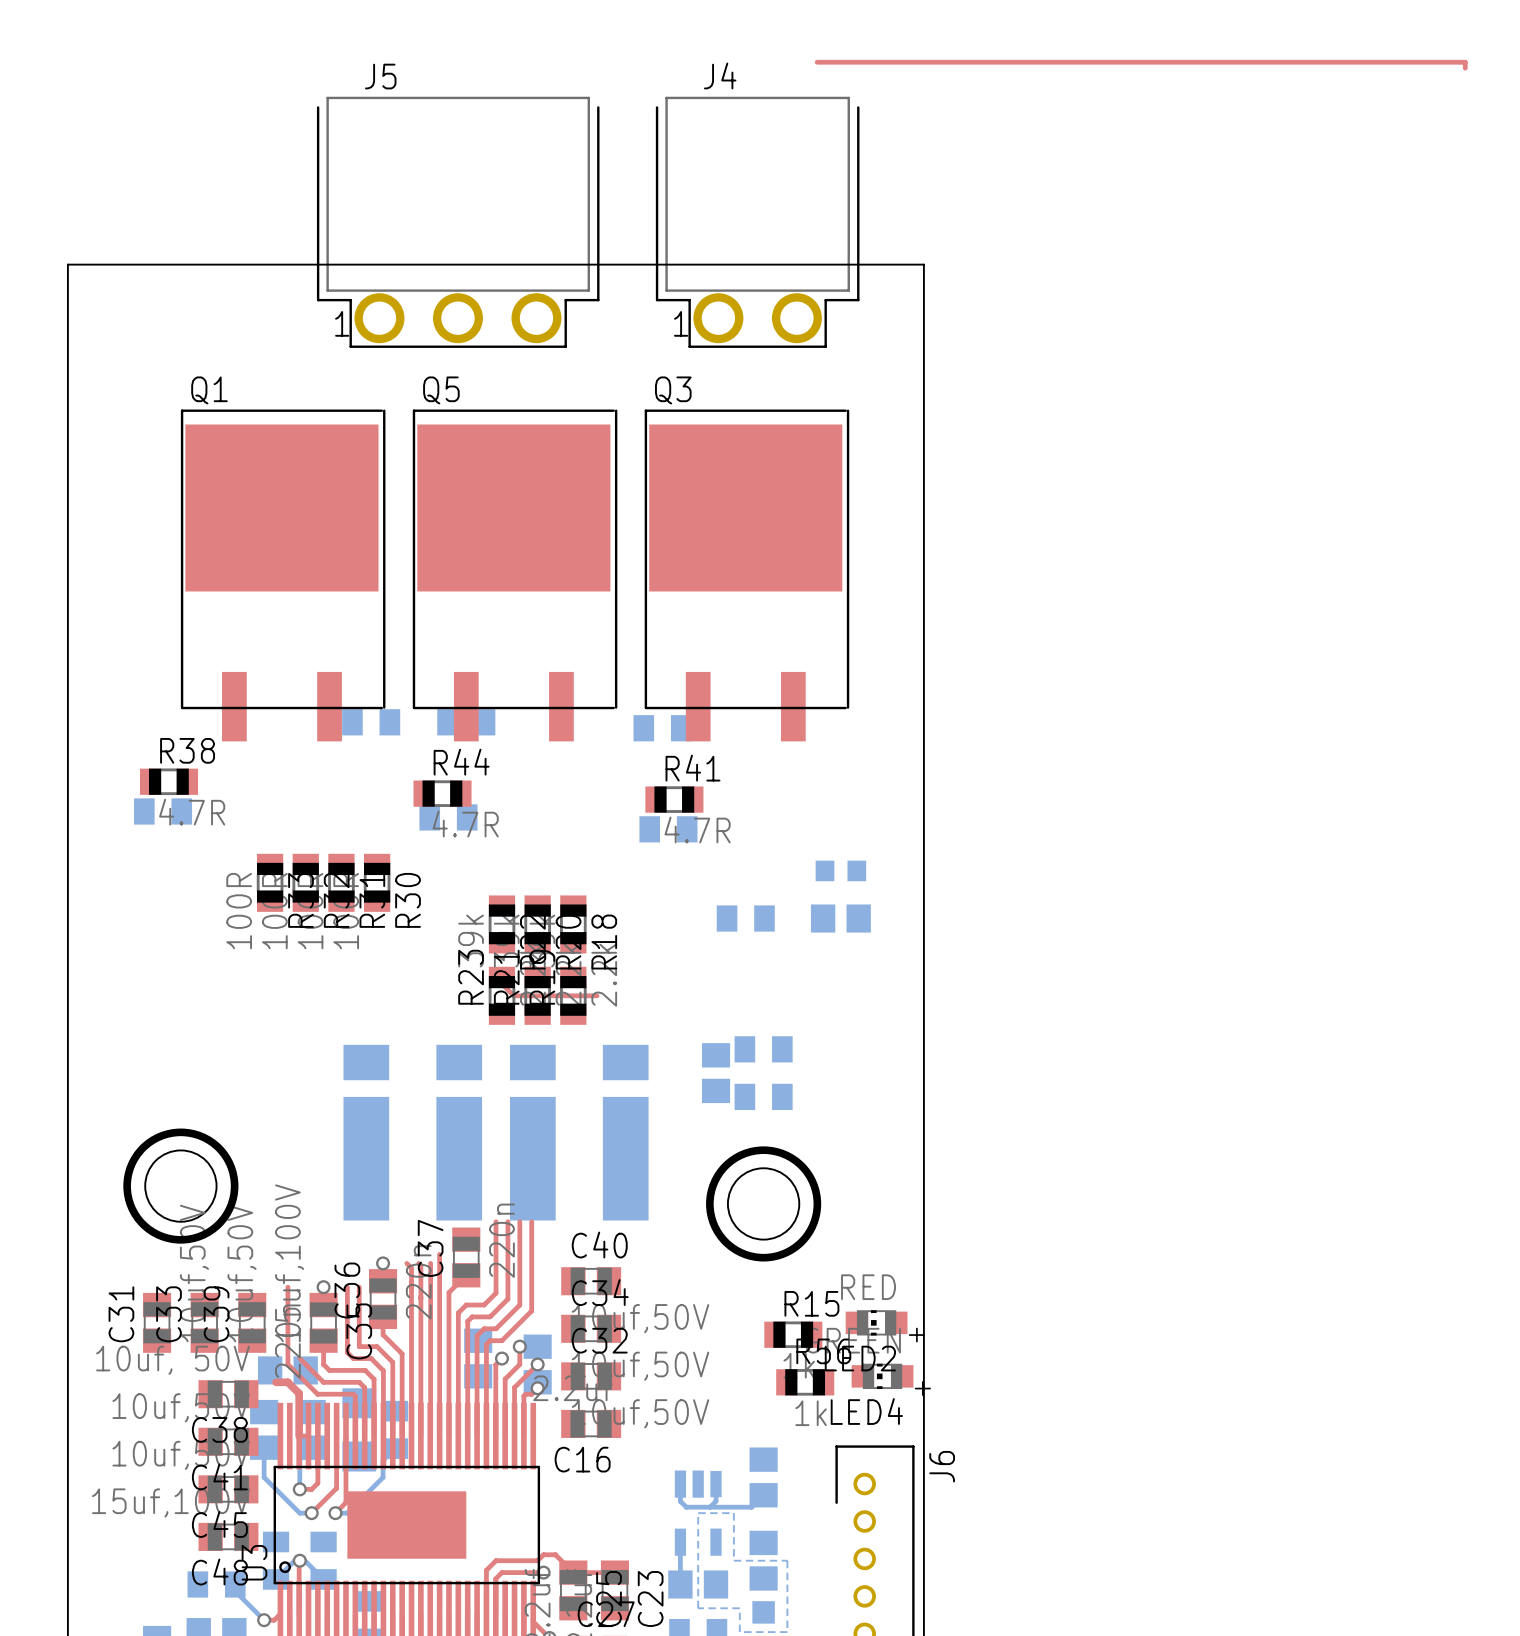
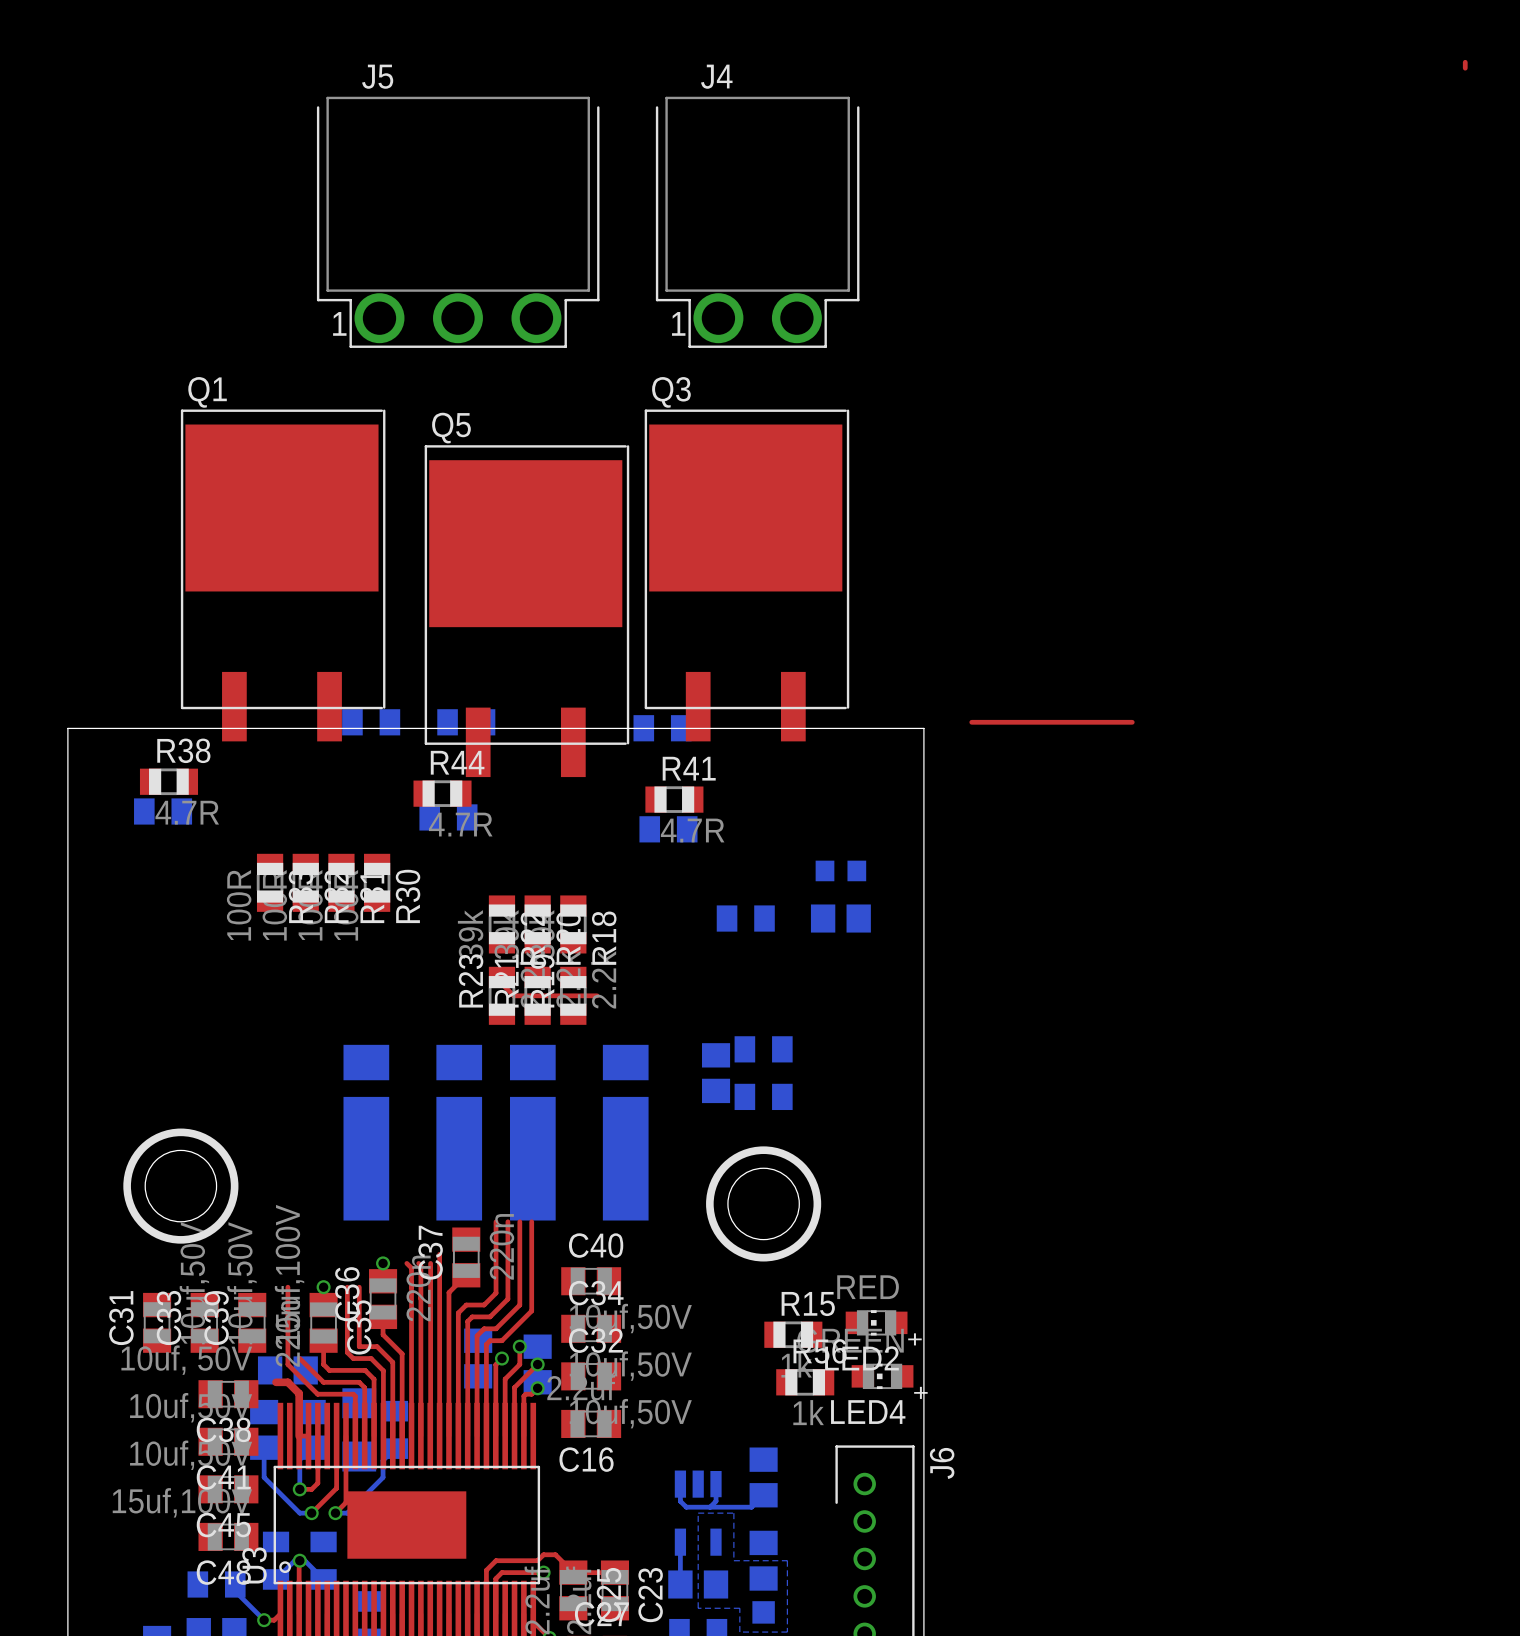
top track: (817, 62) (1465, 62) -> none
Q5 position: (515, 575) -> (526, 611)
top track: none -> (971, 722) (1132, 722)
board edge: (67, 728) (67, 264) (923, 264) (923, 728) -> (67, 728) (923, 728)

